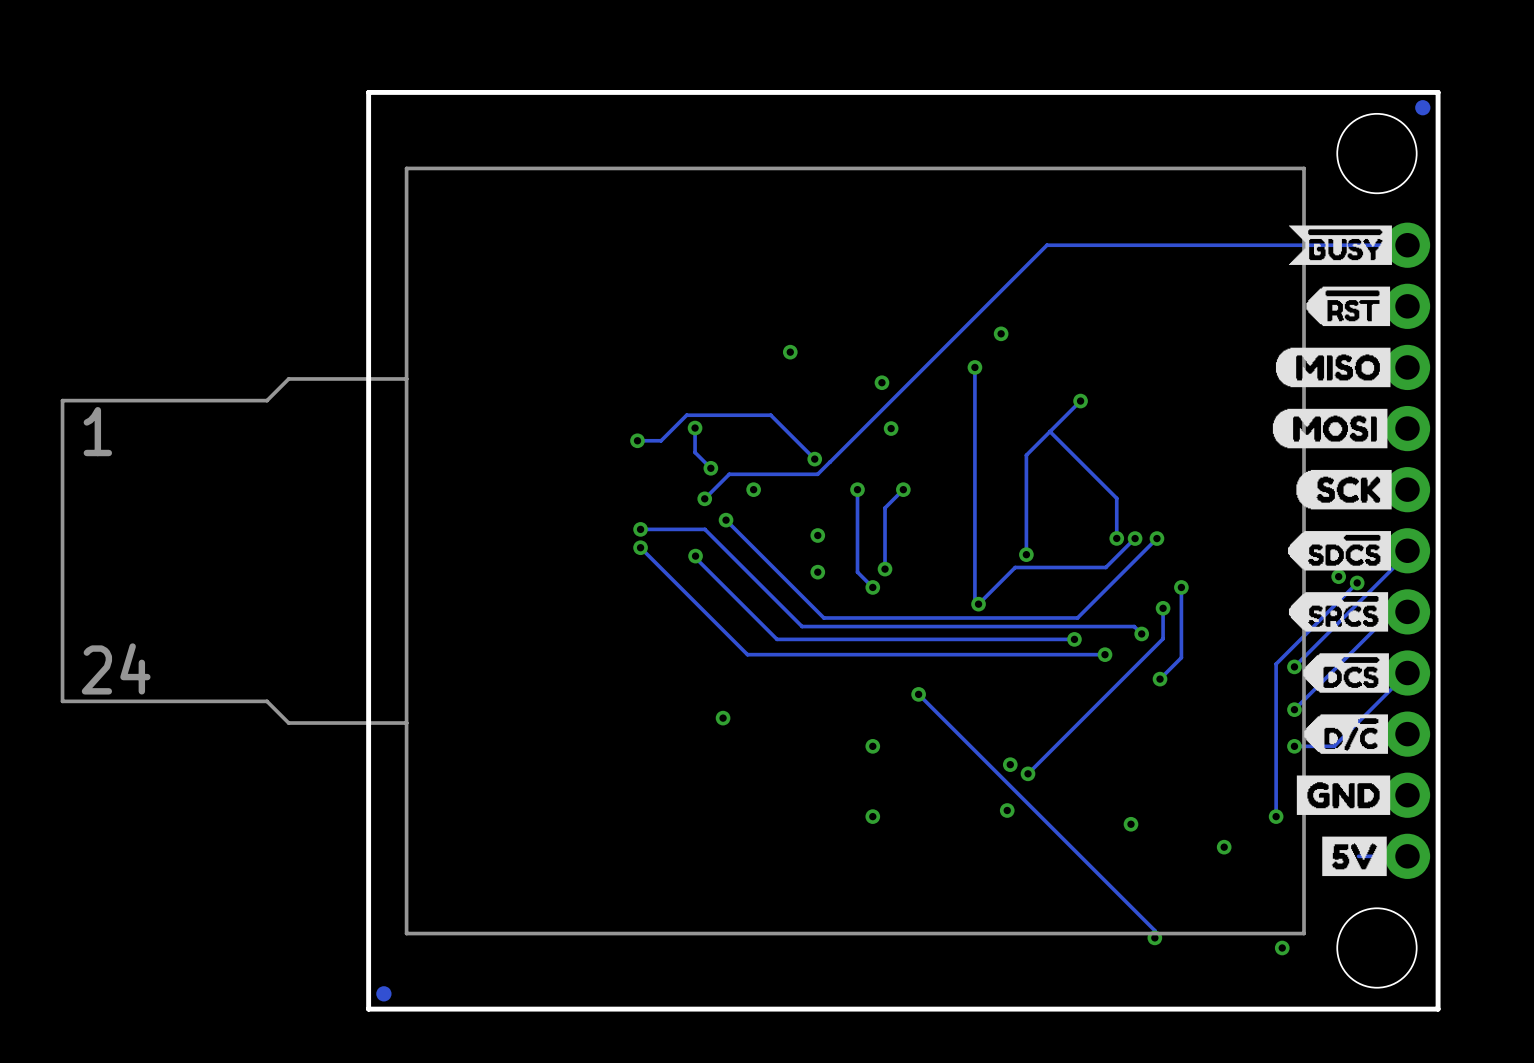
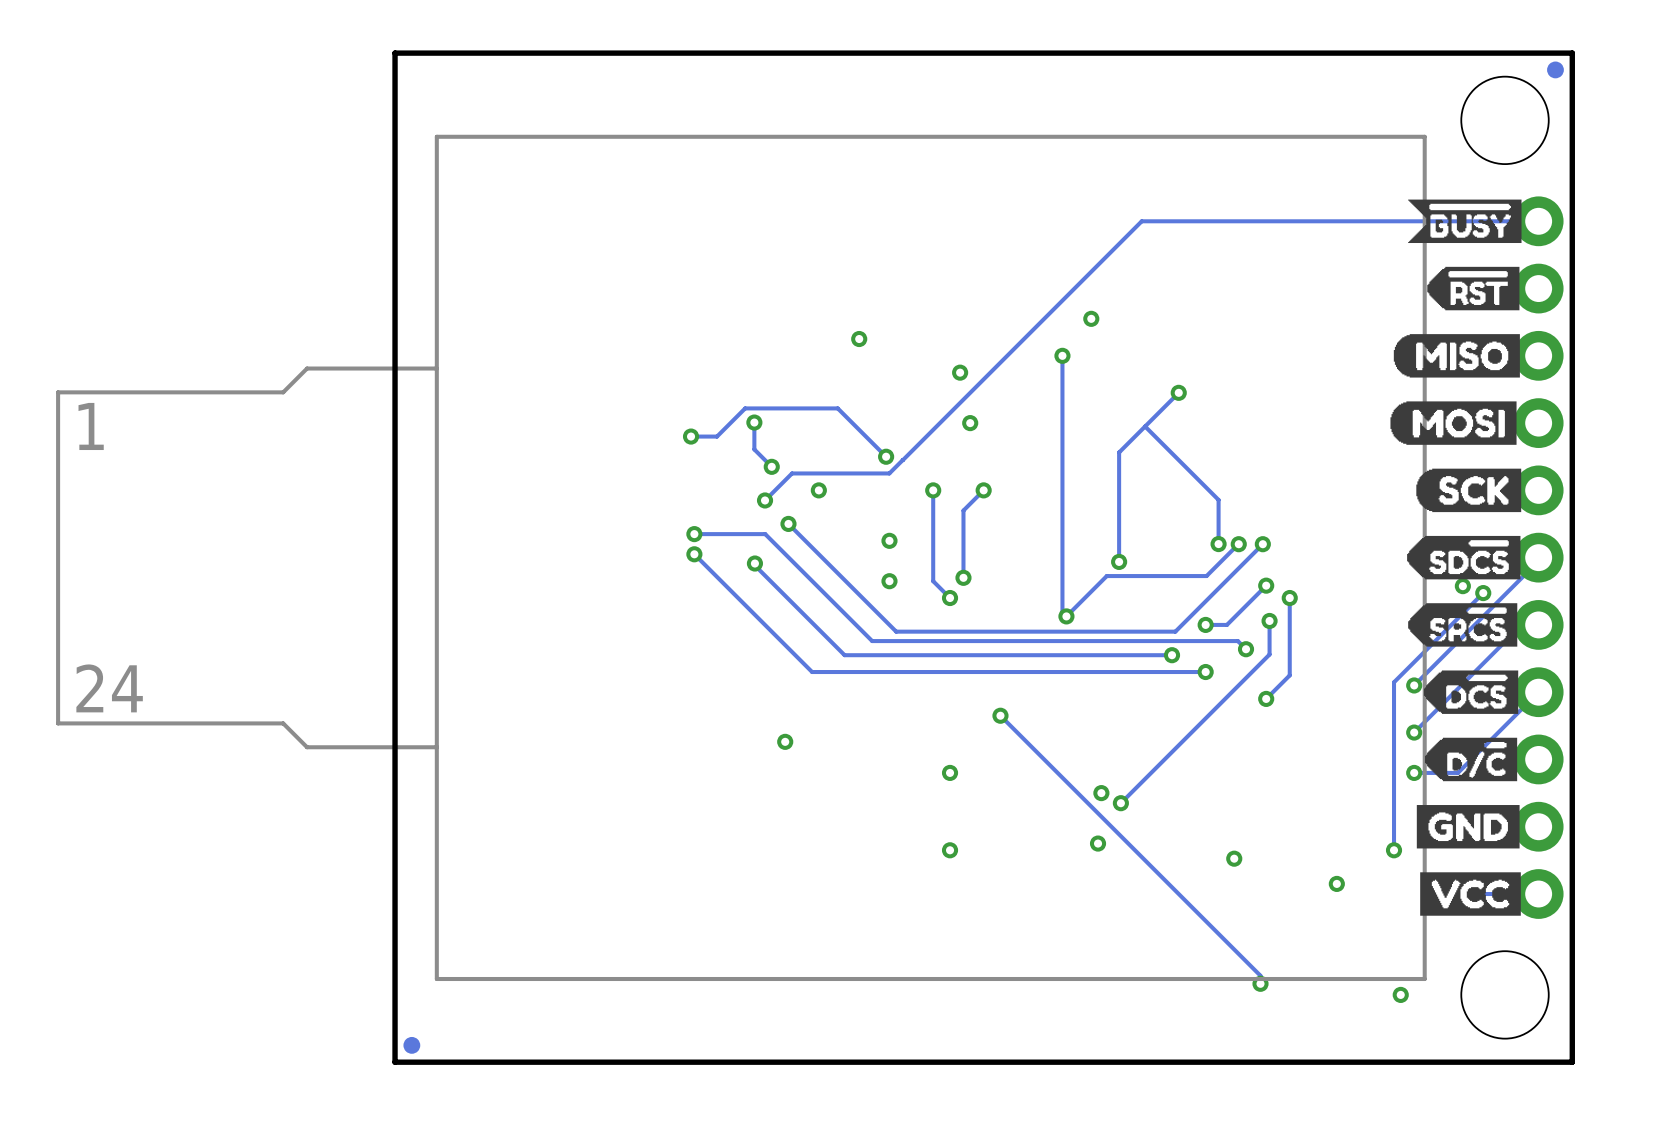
track: none -> (1266, 585) (1226, 624) (1205, 624)
via: none -> (1266, 585)
via: none -> (1205, 624)
drawing shape: [1322, 836, 1387, 877] -> [1420, 872, 1521, 916]

